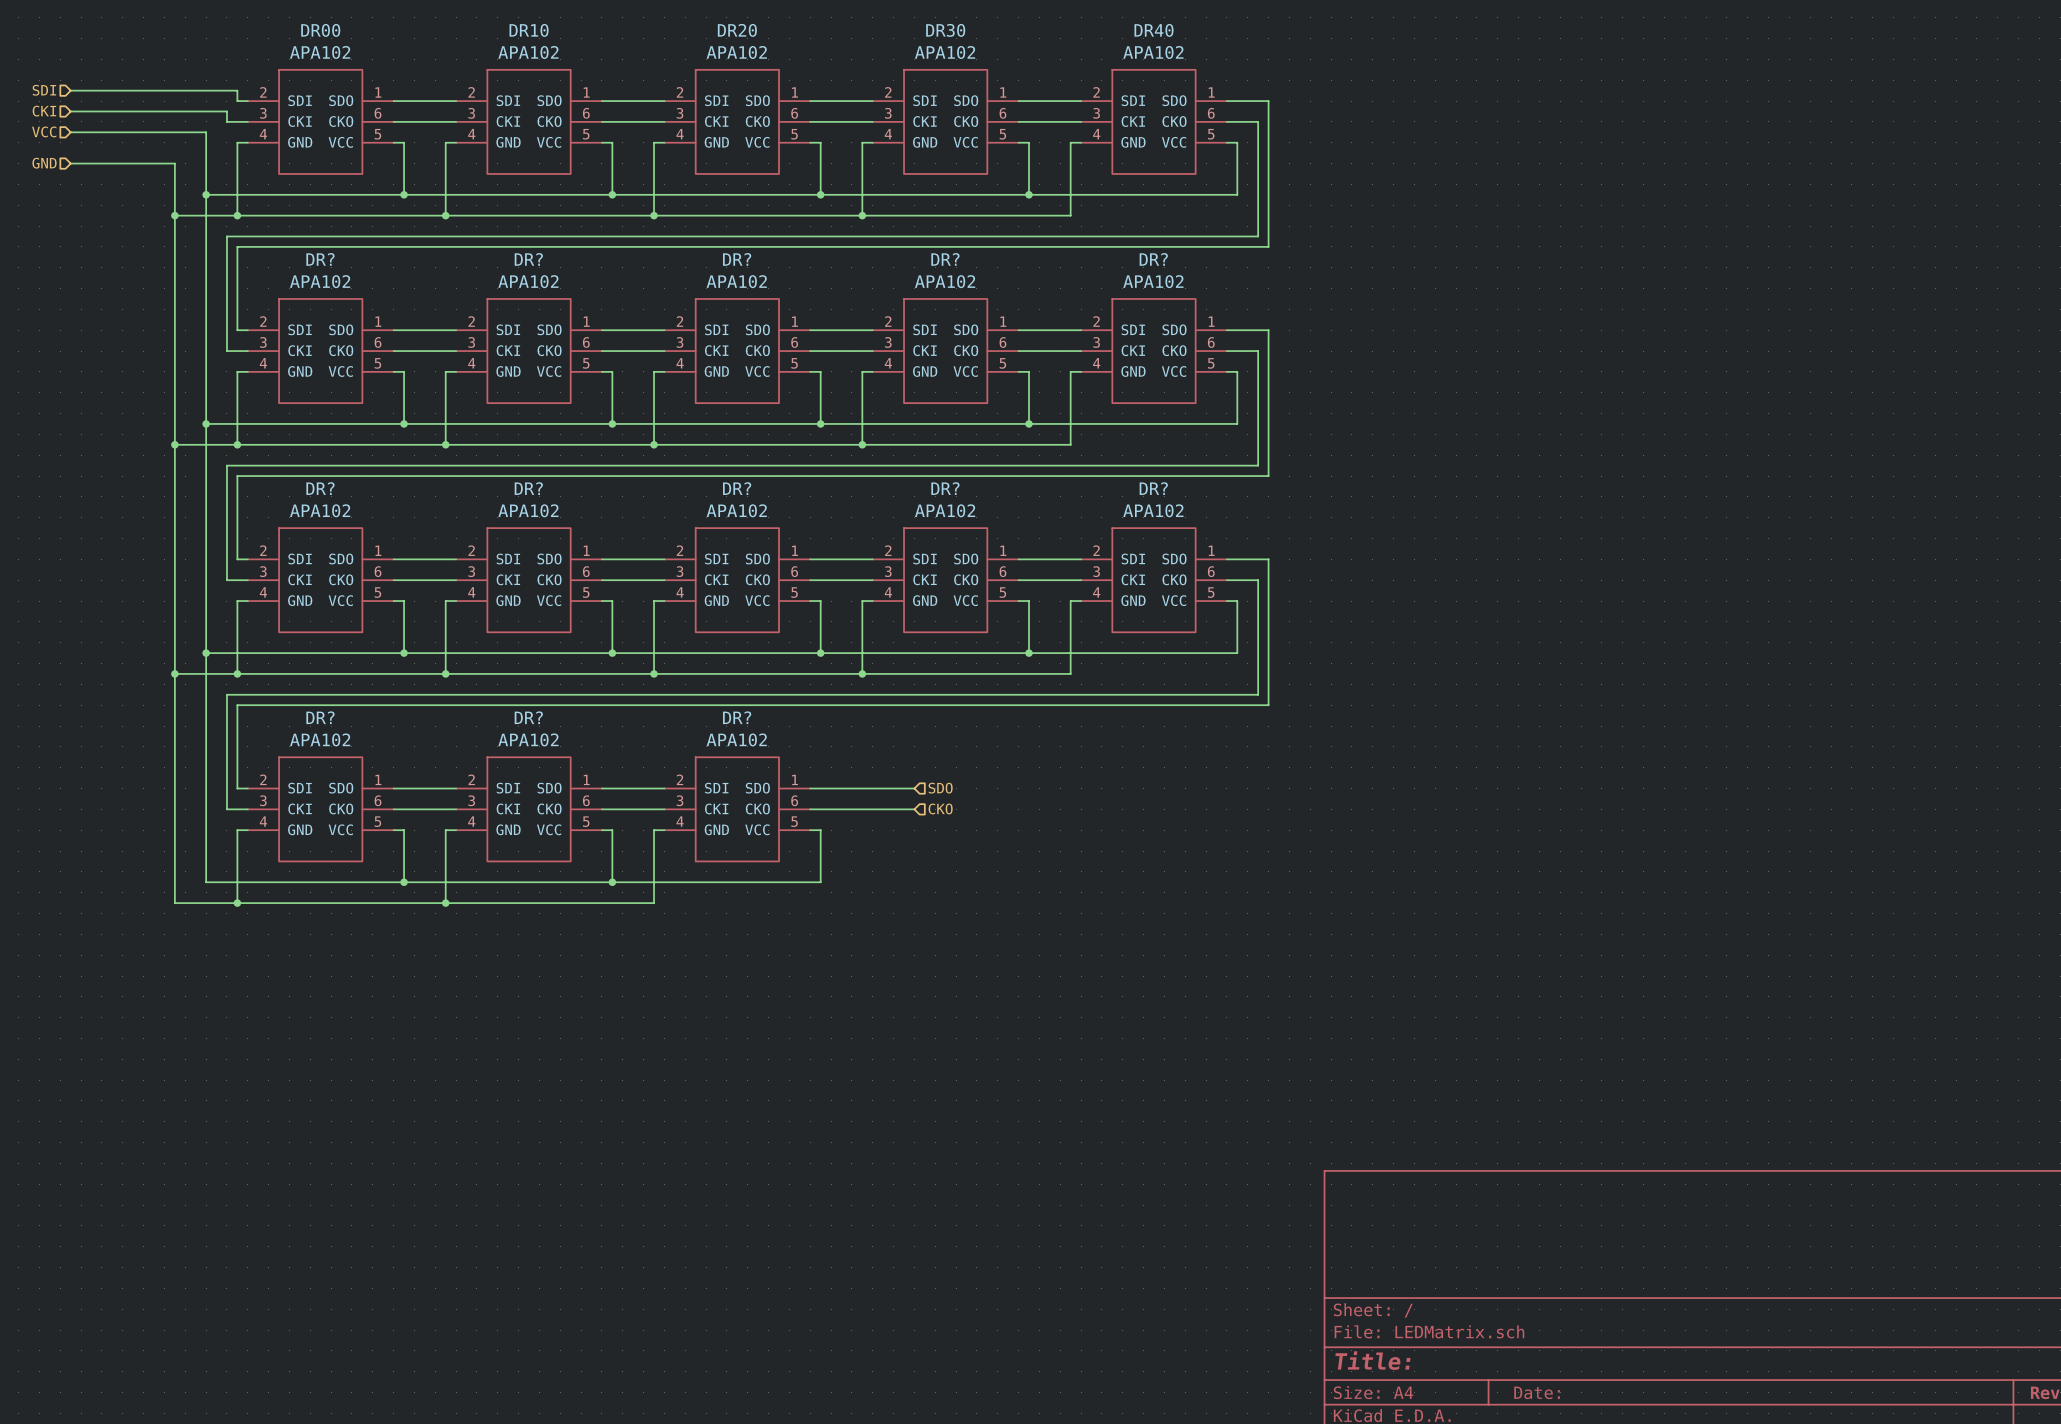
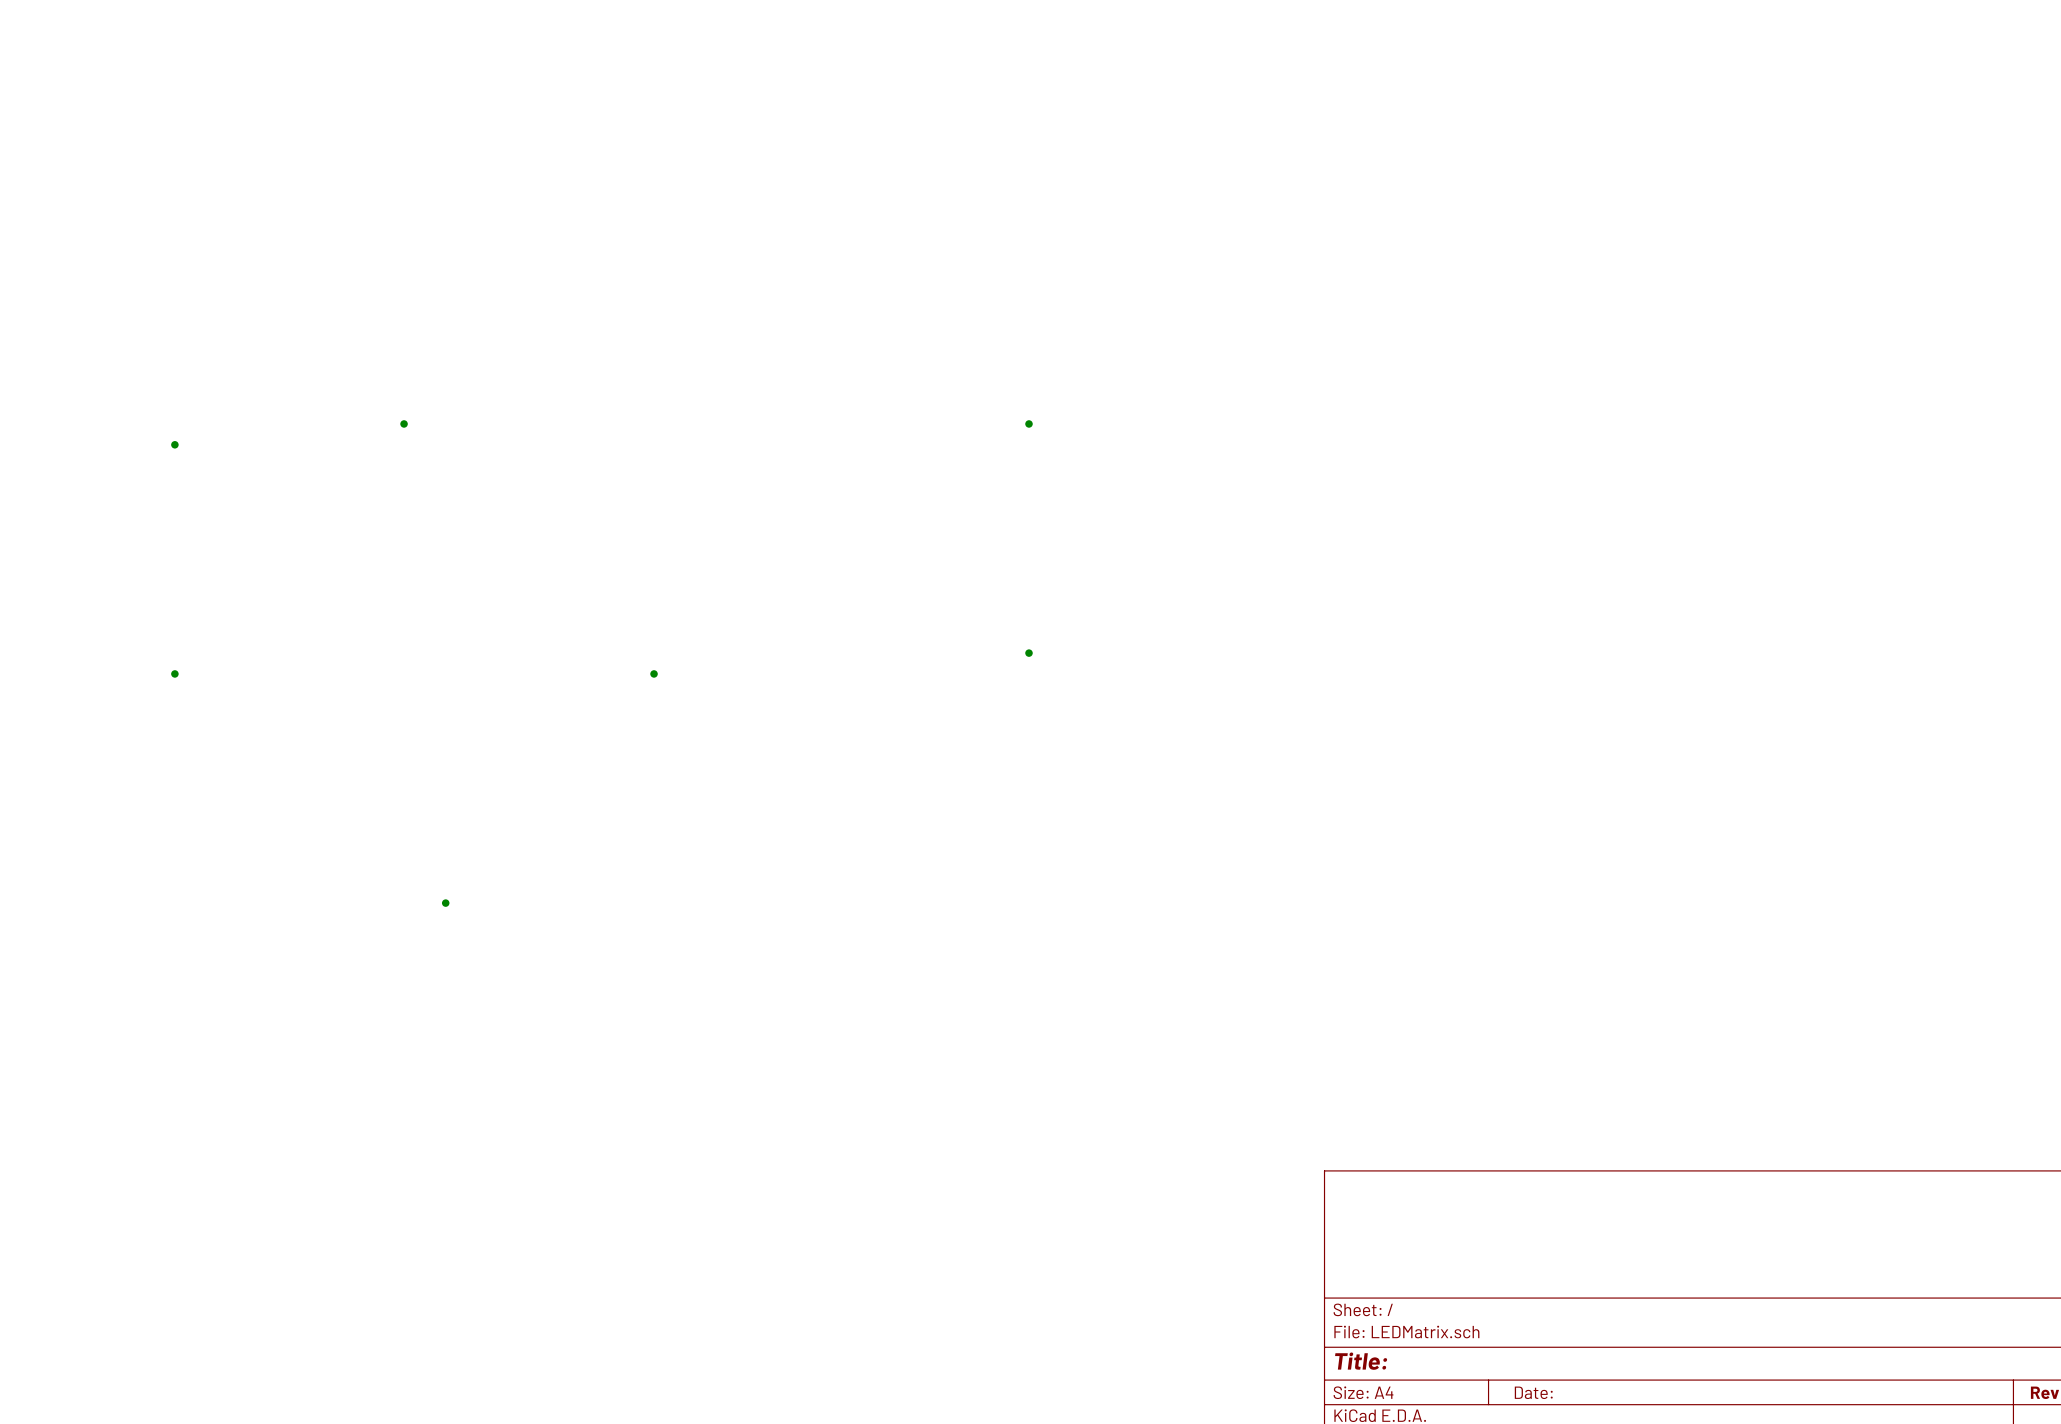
hierarchical label: SDI (44, 90) -> none
wire: (70, 90) (237, 90) (237, 101) (247, 101) -> none
wire: (393, 101) (456, 101) -> none
wire: (601, 101) (664, 101) -> none
wire: (810, 101) (872, 101) -> none
wire: (1018, 101) (1081, 101) -> none
wire: (1226, 101) (1268, 101) (1268, 246) (237, 246) (237, 330) (247, 330) -> none
hierarchical label: CKI (44, 111) -> none
wire: (70, 111) (226, 111) (226, 121) (247, 121) -> none
DR00: APA102 (320, 121) -> none
wire: (393, 121) (456, 121) -> none
DR10: APA102 (529, 121) -> none
wire: (601, 121) (664, 121) -> none
DR20: APA102 (737, 121) -> none
wire: (810, 121) (872, 121) -> none
DR30: APA102 (945, 121) -> none
wire: (1018, 121) (1081, 121) -> none
DR40: APA102 (1153, 121) -> none
wire: (1226, 121) (1258, 121) (1258, 236) (226, 236) (226, 351) (247, 351) -> none
hierarchical label: VCC (44, 131) -> none
wire: (70, 132) (206, 132) (206, 882) (820, 882) (820, 830) (810, 830) -> none
wire: (247, 142) (237, 142) (237, 215) -> none
wire: (393, 142) (404, 142) (404, 194) -> none
wire: (456, 142) (445, 142) (445, 215) -> none
wire: (601, 142) (612, 142) (612, 194) -> none
wire: (664, 142) (654, 142) (654, 215) -> none
wire: (810, 142) (820, 142) (820, 194) -> none
wire: (872, 142) (862, 142) (862, 215) -> none
wire: (1018, 142) (1029, 142) (1029, 194) -> none
wire: (1081, 142) (1070, 142) (1070, 215) (174, 215) -> none
wire: (1226, 142) (1237, 142) (1237, 194) (206, 194) -> none
hierarchical label: GND (44, 163) -> none
wire: (70, 163) (174, 163) (174, 903) (654, 903) (654, 830) (664, 830) -> none
junction: (206, 194) -> none
junction: (404, 194) -> none
junction: (612, 194) -> none
junction: (820, 194) -> none
junction: (1029, 194) -> none
junction: (174, 215) -> none
junction: (237, 215) -> none
junction: (445, 215) -> none
junction: (654, 215) -> none
junction: (862, 215) -> none
wire: (393, 330) (456, 330) -> none
wire: (601, 330) (664, 330) -> none
wire: (810, 330) (872, 330) -> none
wire: (1018, 330) (1081, 330) -> none
wire: (1226, 330) (1268, 330) (1268, 476) (237, 476) (237, 559) (247, 559) -> none
DR?: APA102 (320, 351) -> none
wire: (393, 351) (456, 351) -> none
DR?: APA102 (529, 351) -> none
wire: (601, 351) (664, 351) -> none
DR?: APA102 (737, 351) -> none
wire: (810, 351) (872, 351) -> none
DR?: APA102 (945, 351) -> none
wire: (1018, 351) (1081, 351) -> none
DR?: APA102 (1153, 351) -> none
wire: (1226, 351) (1258, 351) (1258, 465) (226, 465) (226, 580) (247, 580) -> none
wire: (247, 371) (237, 371) (237, 444) -> none
wire: (393, 371) (404, 371) (404, 423) -> none
wire: (456, 371) (445, 371) (445, 444) -> none
wire: (601, 371) (612, 371) (612, 423) -> none
wire: (664, 371) (654, 371) (654, 444) -> none
wire: (810, 371) (820, 371) (820, 423) -> none
wire: (872, 371) (862, 371) (862, 444) -> none
wire: (1018, 371) (1029, 371) (1029, 423) -> none
wire: (1081, 371) (1070, 371) (1070, 444) (174, 444) -> none
wire: (1226, 371) (1237, 371) (1237, 423) (206, 423) -> none
junction: (206, 423) -> none
junction: (612, 423) -> none
junction: (820, 423) -> none
junction: (237, 444) -> none
junction: (445, 444) -> none
junction: (654, 444) -> none
junction: (862, 444) -> none
wire: (393, 559) (456, 559) -> none
wire: (601, 559) (664, 559) -> none
wire: (810, 559) (872, 559) -> none
wire: (1018, 559) (1081, 559) -> none
wire: (1226, 559) (1268, 559) (1268, 705) (237, 705) (237, 788) (247, 788) -> none
DR?: APA102 (320, 580) -> none
wire: (393, 580) (456, 580) -> none
DR?: APA102 (529, 580) -> none
wire: (601, 580) (664, 580) -> none
DR?: APA102 (737, 580) -> none
wire: (810, 580) (872, 580) -> none
DR?: APA102 (945, 580) -> none
wire: (1018, 580) (1081, 580) -> none
DR?: APA102 (1153, 580) -> none
wire: (1226, 580) (1258, 580) (1258, 694) (226, 694) (226, 809) (247, 809) -> none
wire: (247, 601) (237, 601) (237, 673) -> none
wire: (393, 601) (404, 601) (404, 653) -> none
wire: (456, 601) (445, 601) (445, 673) -> none
wire: (601, 601) (612, 601) (612, 653) -> none
wire: (664, 601) (654, 601) (654, 673) -> none
wire: (810, 601) (820, 601) (820, 653) -> none
wire: (872, 601) (862, 601) (862, 673) -> none
wire: (1018, 601) (1029, 601) (1029, 653) -> none
wire: (1081, 601) (1070, 601) (1070, 673) (174, 673) -> none
wire: (1226, 601) (1237, 601) (1237, 653) (206, 653) -> none
junction: (206, 653) -> none
junction: (404, 653) -> none
junction: (612, 653) -> none
junction: (820, 653) -> none
junction: (237, 673) -> none
junction: (445, 673) -> none
junction: (862, 673) -> none
wire: (393, 788) (456, 788) -> none
wire: (601, 788) (664, 788) -> none
wire: (810, 788) (914, 788) -> none
hierarchical label: SDO (940, 788) -> none
hierarchical label: CKO (940, 808) -> none
DR?: APA102 (320, 809) -> none
wire: (393, 809) (456, 809) -> none
DR?: APA102 (529, 809) -> none
wire: (601, 809) (664, 809) -> none
DR?: APA102 (737, 809) -> none
wire: (810, 809) (914, 809) -> none
wire: (247, 830) (237, 830) (237, 903) -> none
wire: (393, 830) (404, 830) (404, 882) -> none
wire: (456, 830) (445, 830) (445, 903) -> none
wire: (601, 830) (612, 830) (612, 882) -> none
junction: (404, 882) -> none
junction: (612, 882) -> none
junction: (237, 903) -> none

